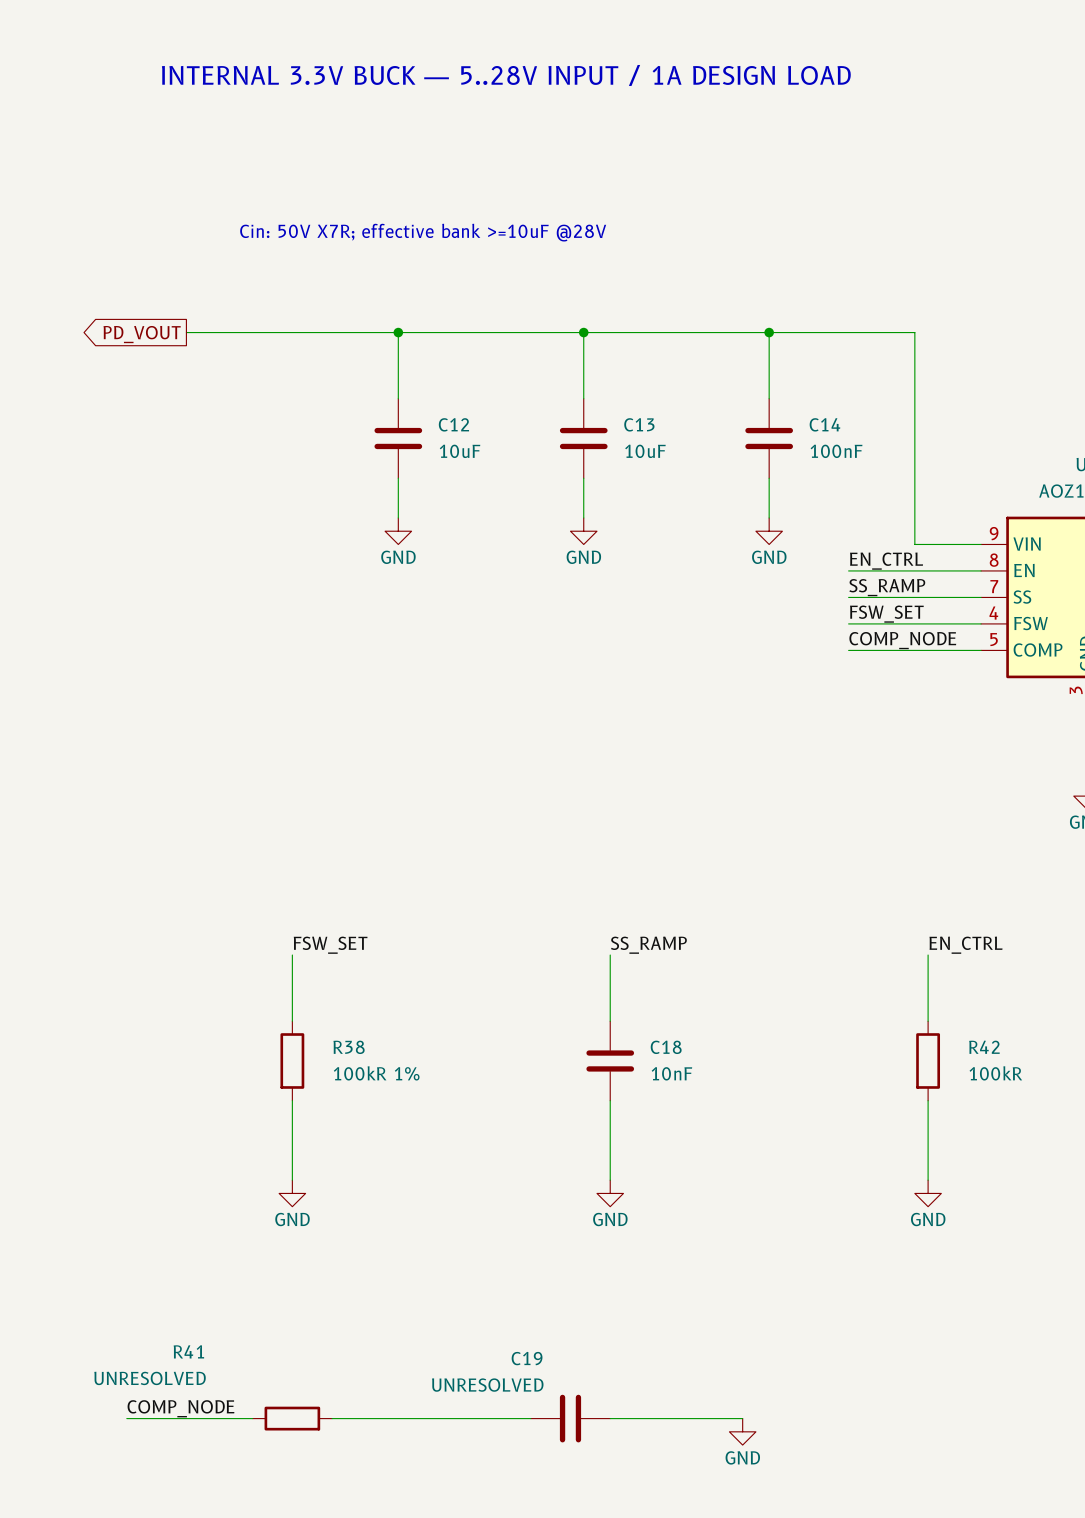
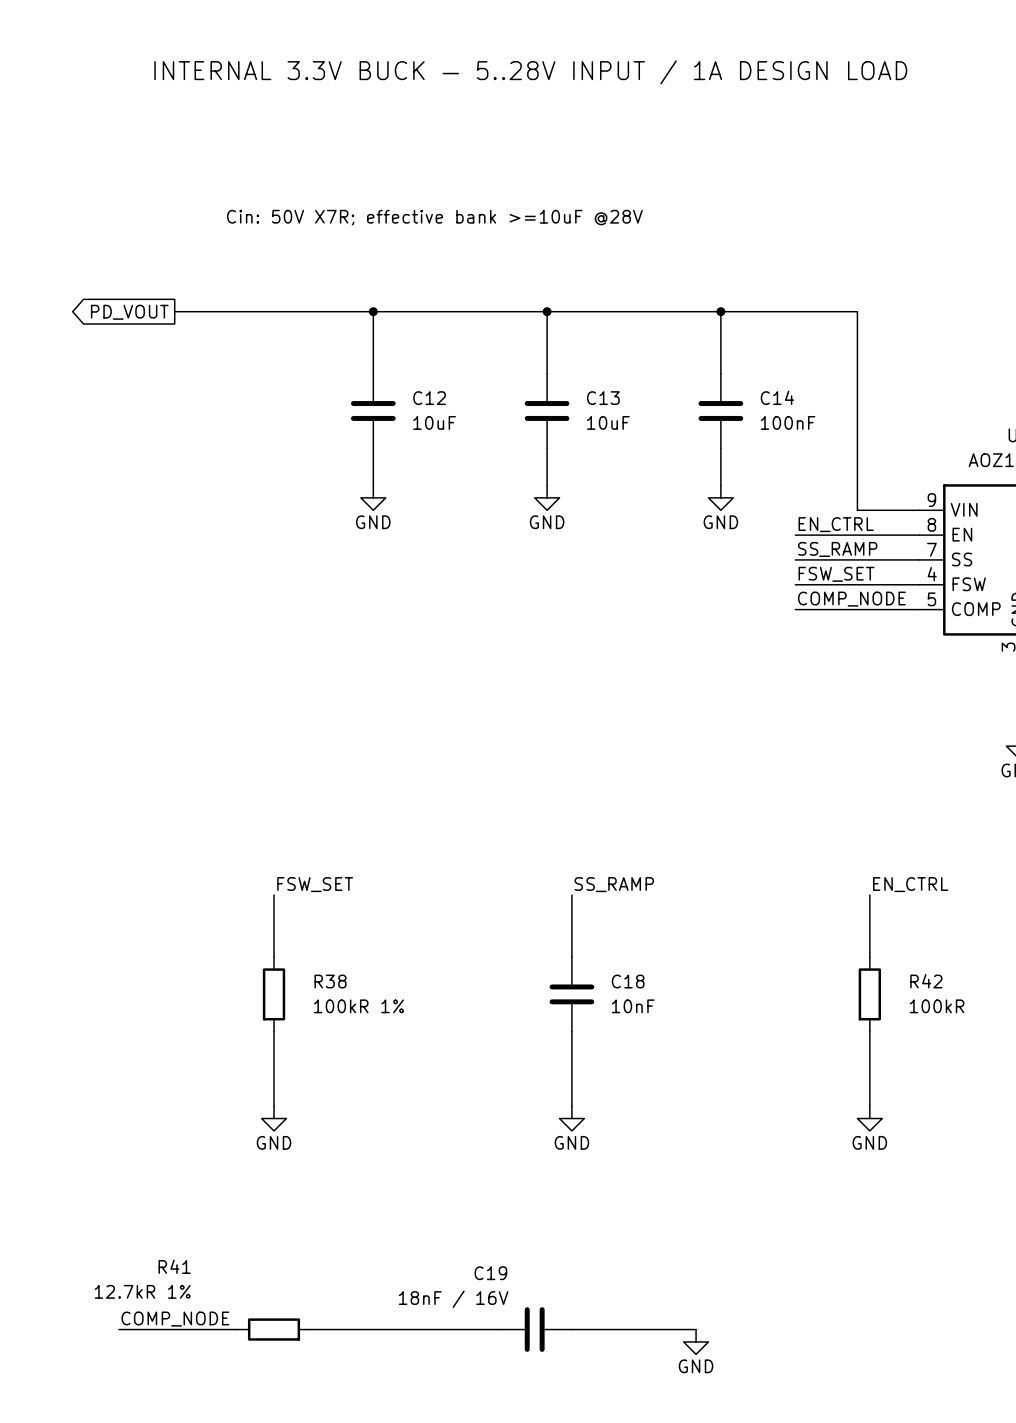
R41 value: UNRESOLVED (150, 1378) -> 12.7kR 1% (142, 1291)
C19 value: UNRESOLVED (487, 1385) -> 18nF / 16V (453, 1299)

